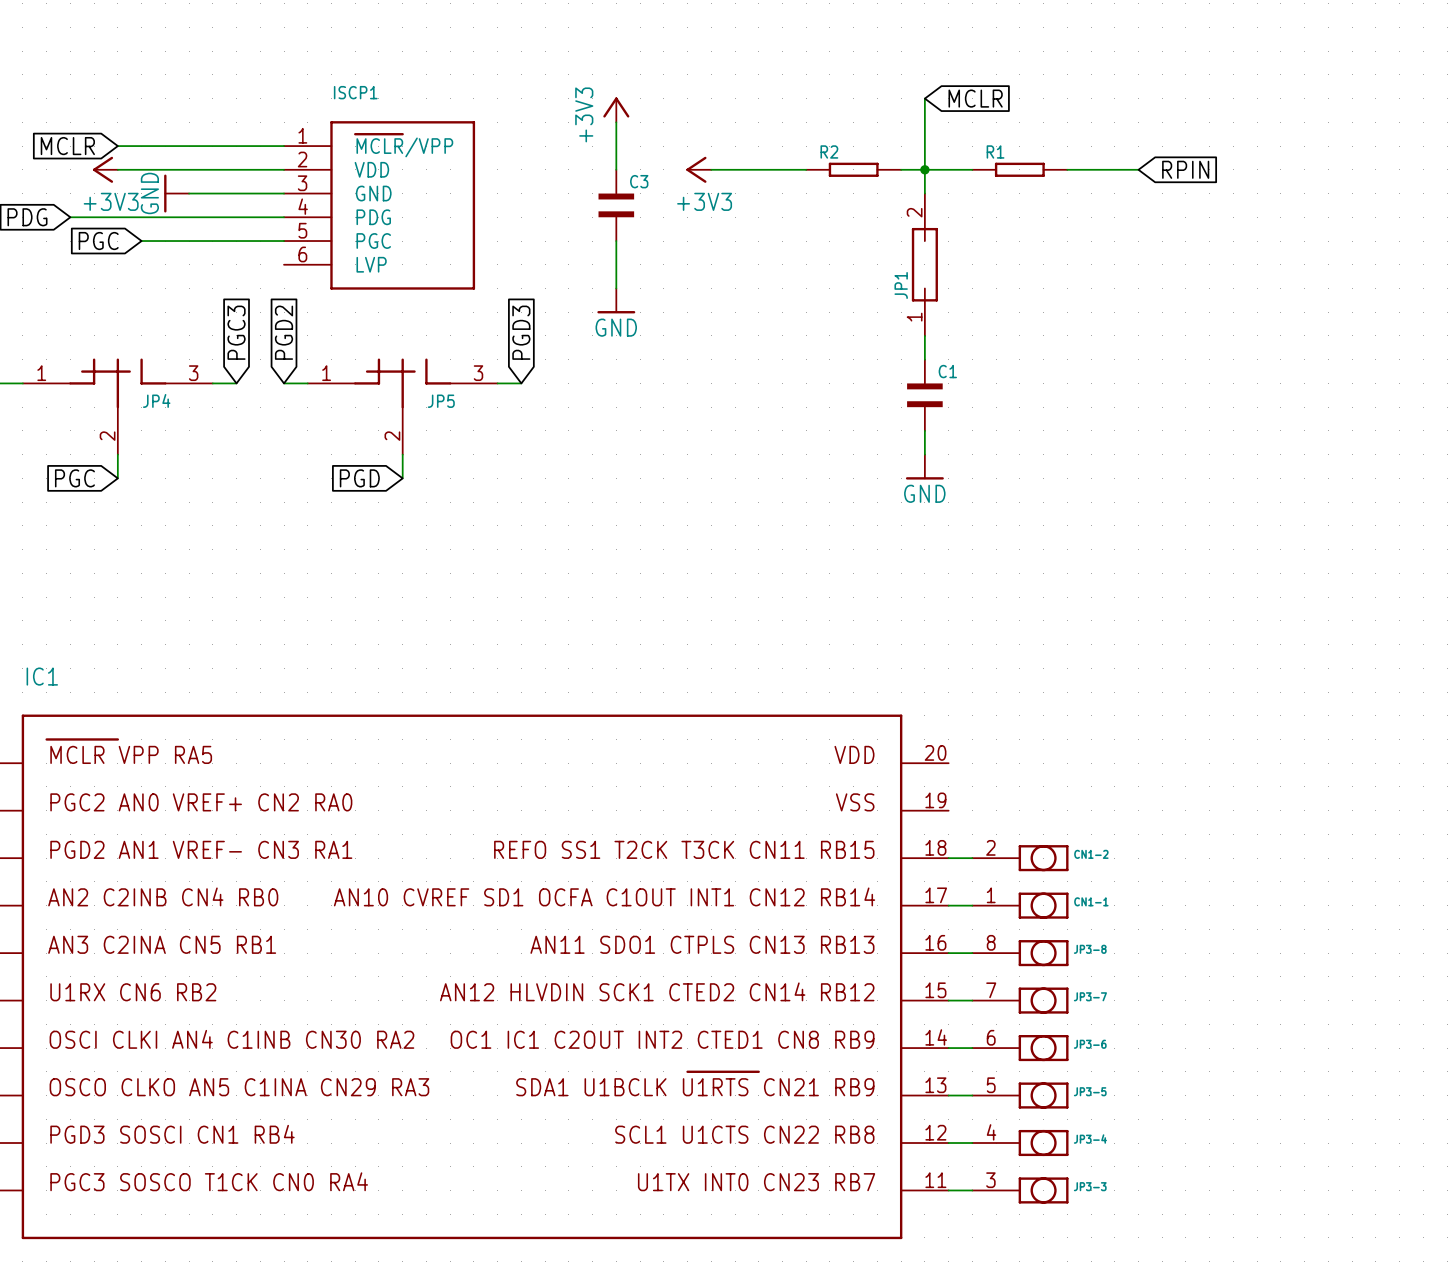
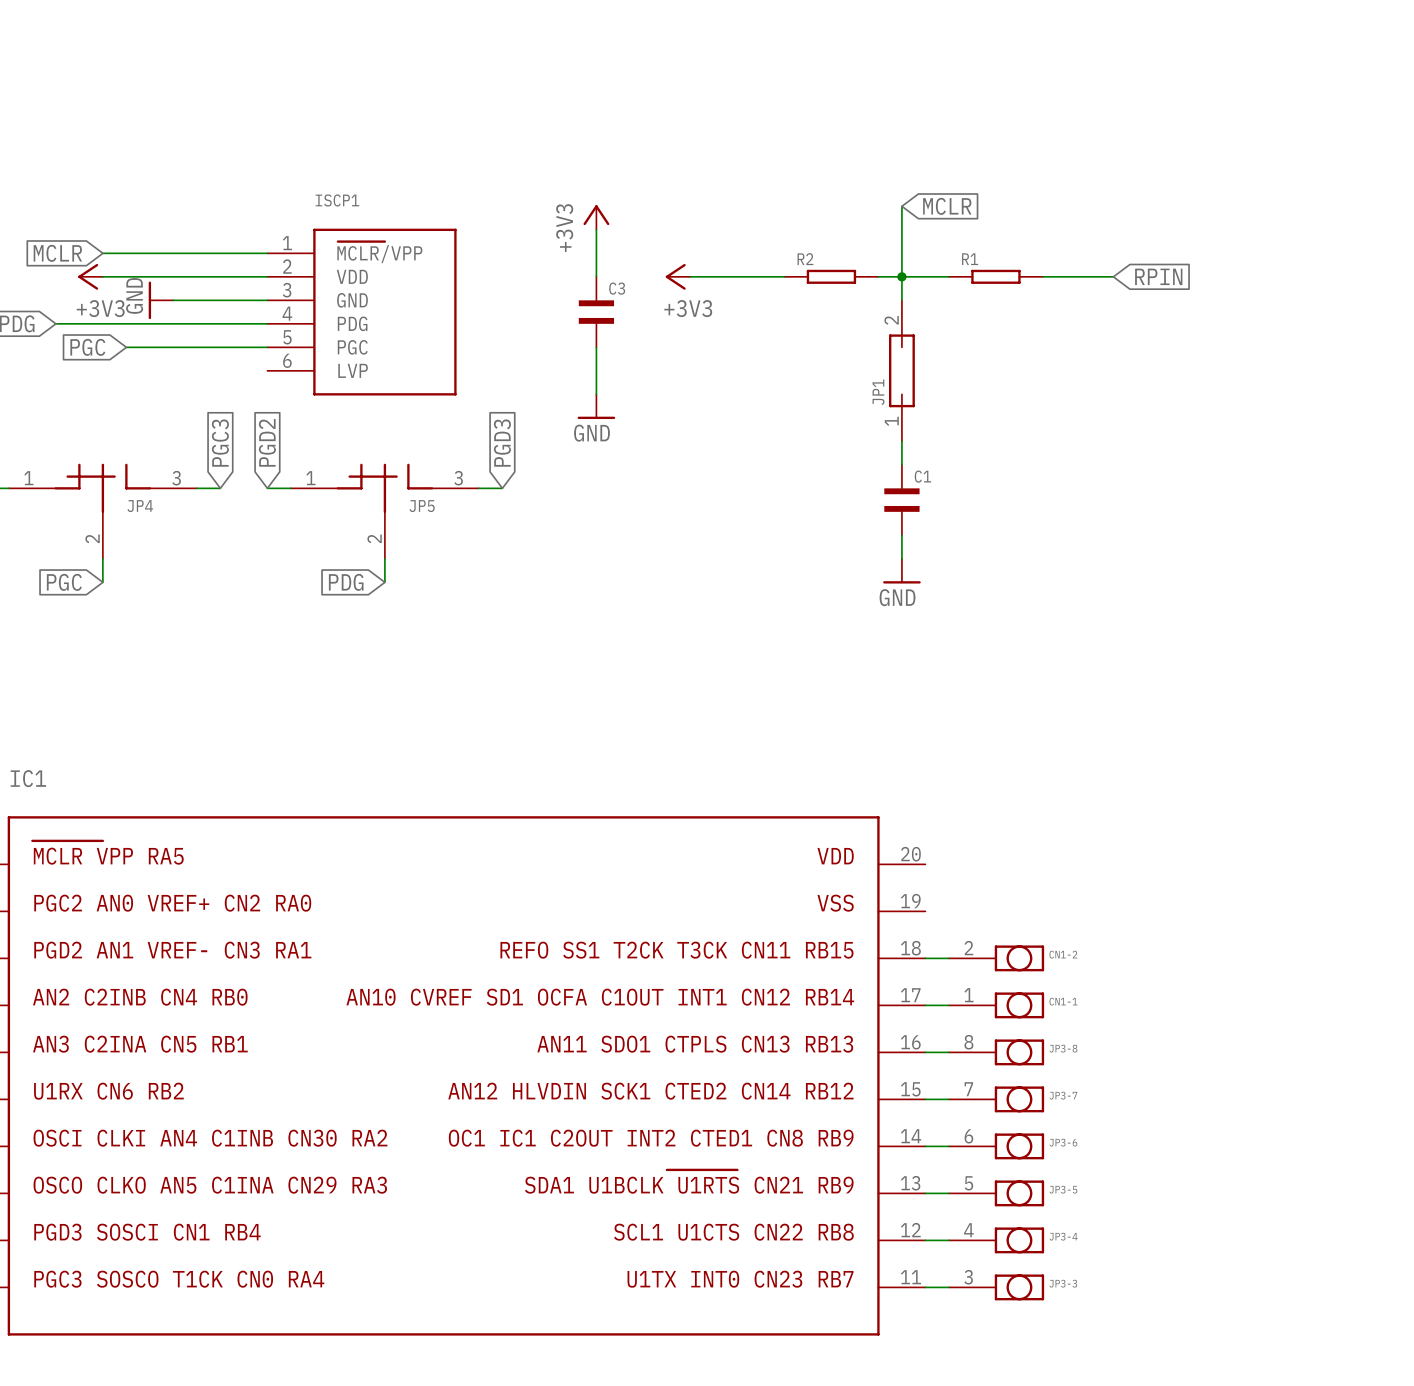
global label: PGD (359, 478) -> PDG (346, 582)

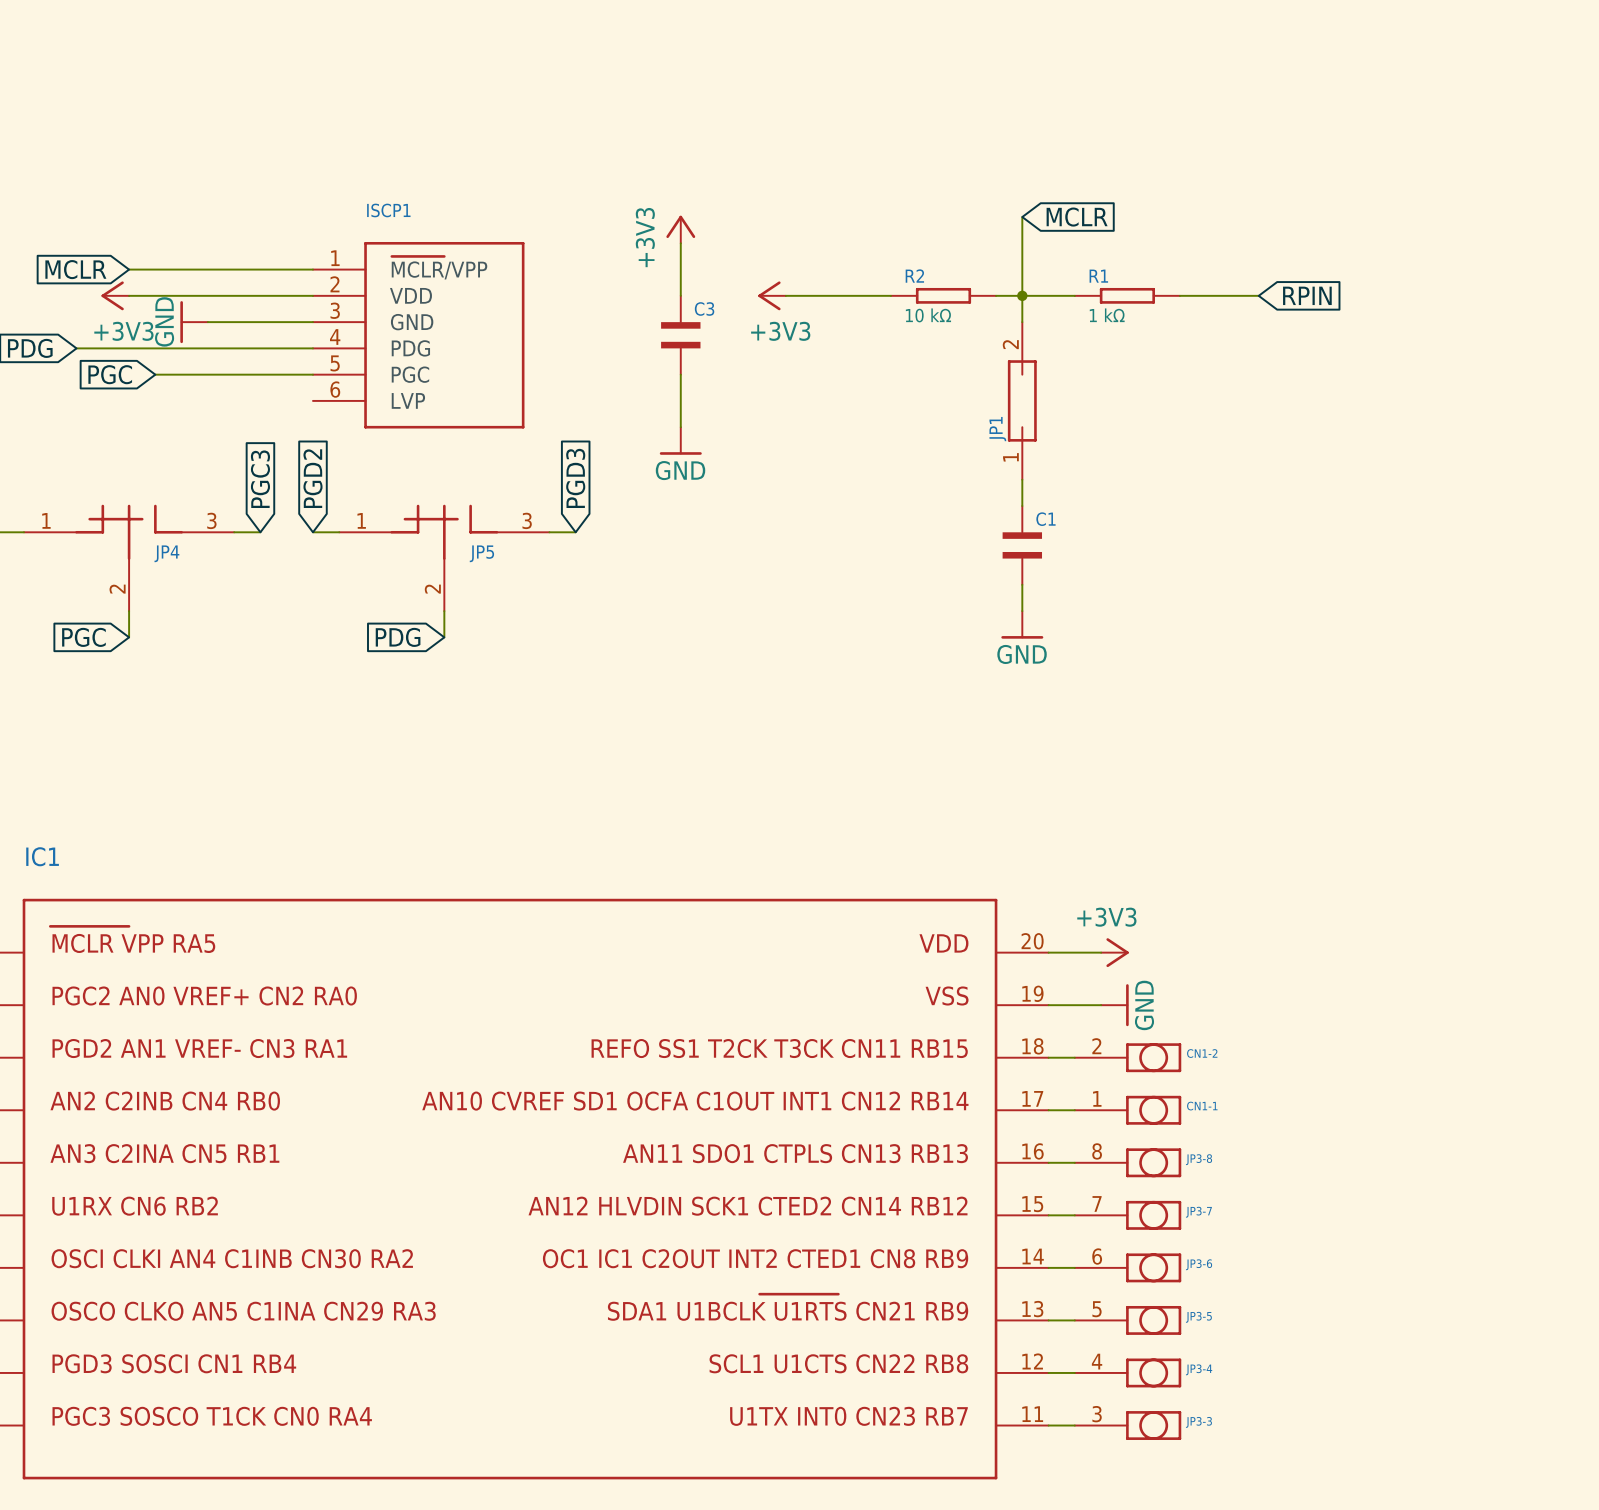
R2 value: none -> 10 kΩ (928, 315)
R1 value: none -> 1 kΩ (1107, 315)
wire: none -> (1048, 952) (1101, 952)
power symbol: none -> +3V3 (1114, 952)
wire: none -> (1048, 1005) (1101, 1005)
power symbol: none -> GND (1114, 1005)

